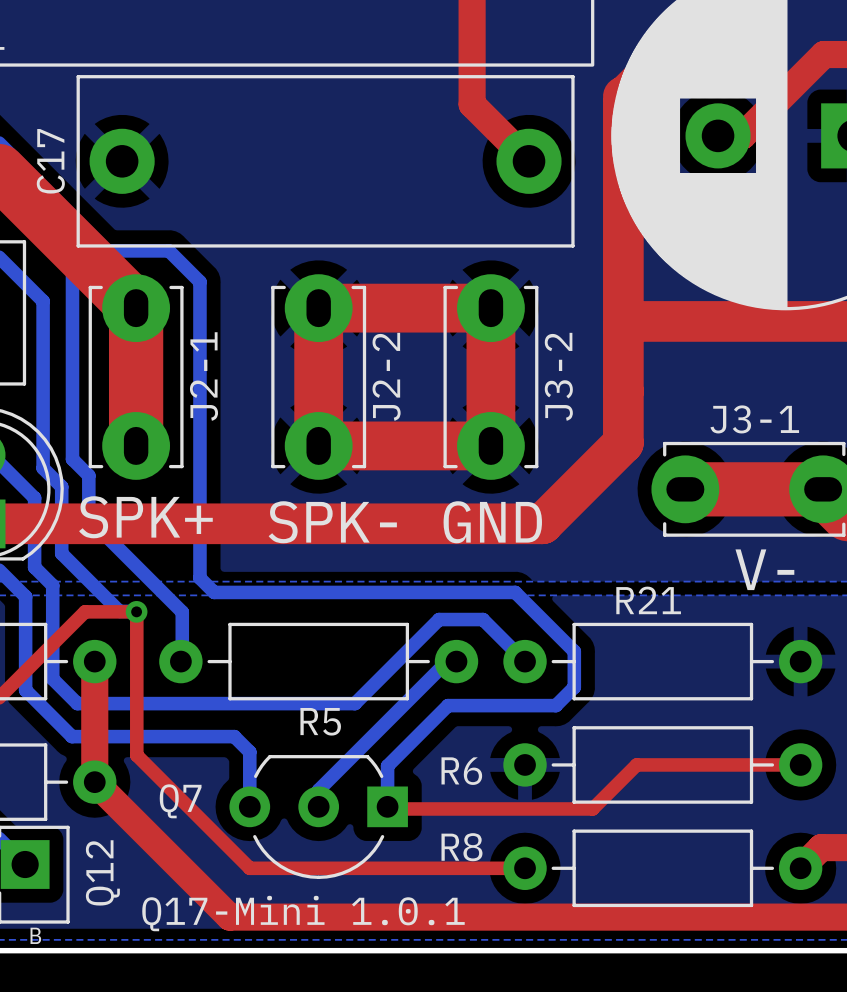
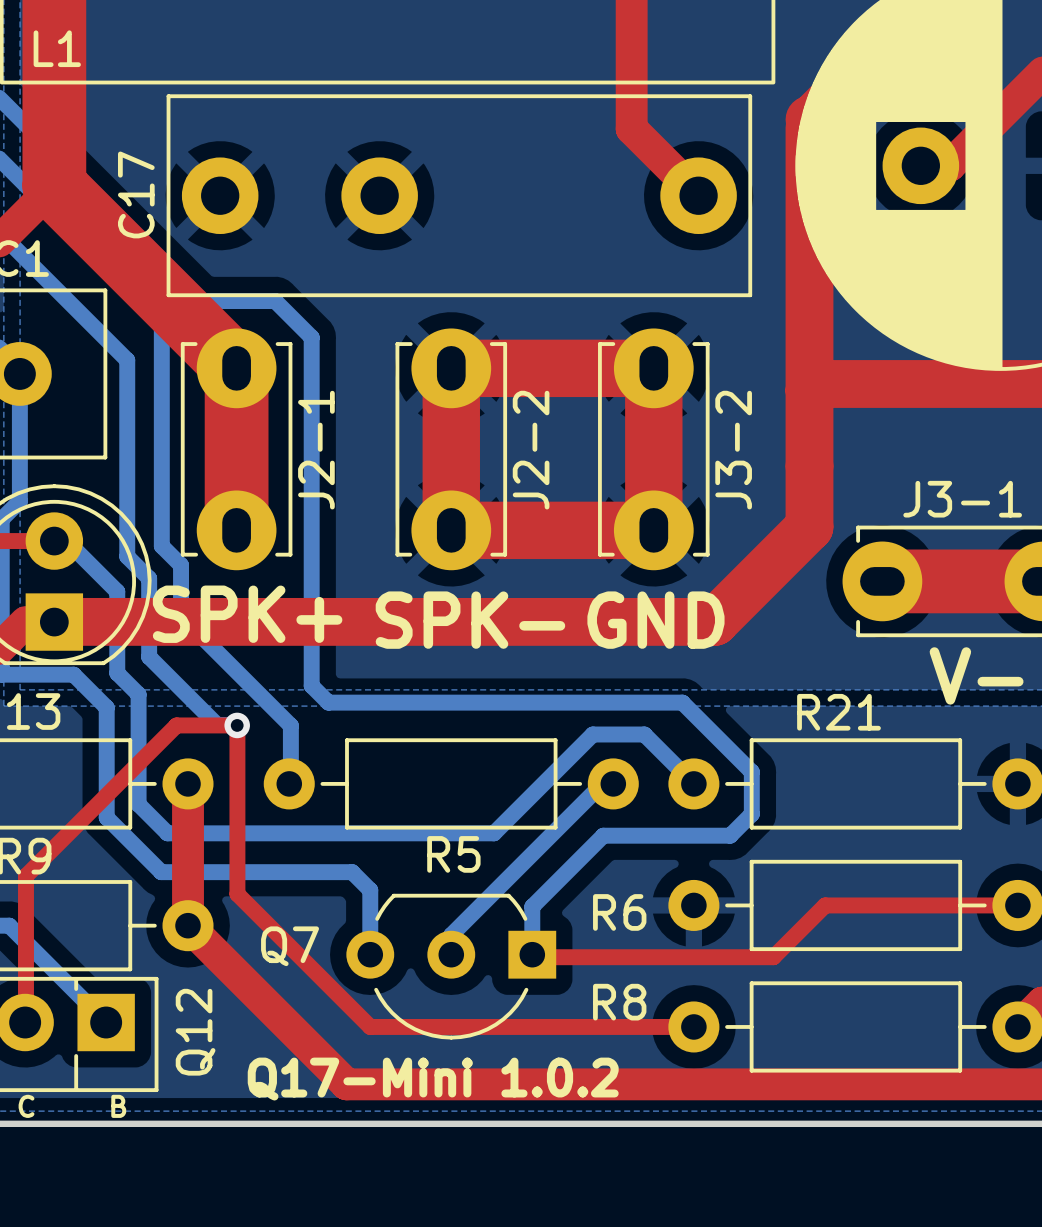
C17 footprint: [76, 75, 575, 248] -> [166, 94, 753, 298]
text: Q17-Mini 1.0.1 (303, 913) -> Q17-Mini 1.0.2 (433, 1079)

